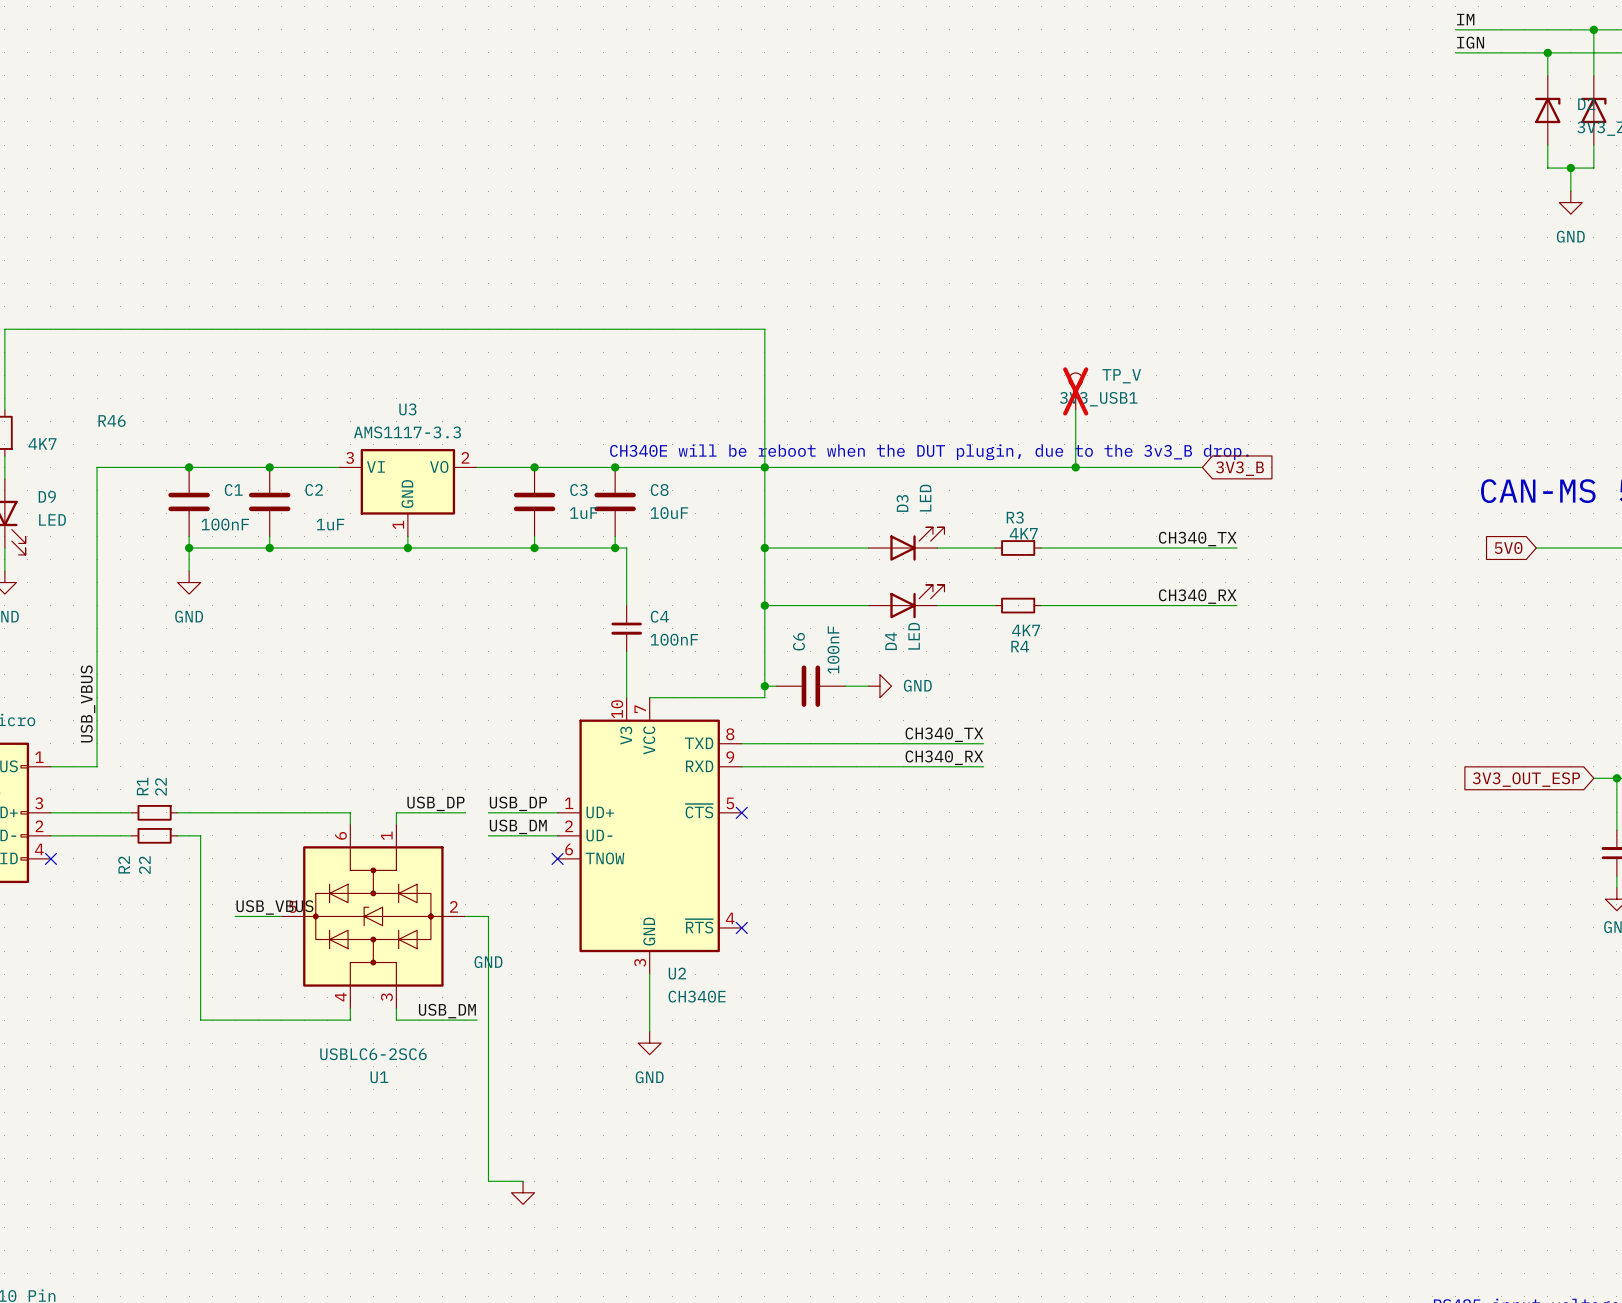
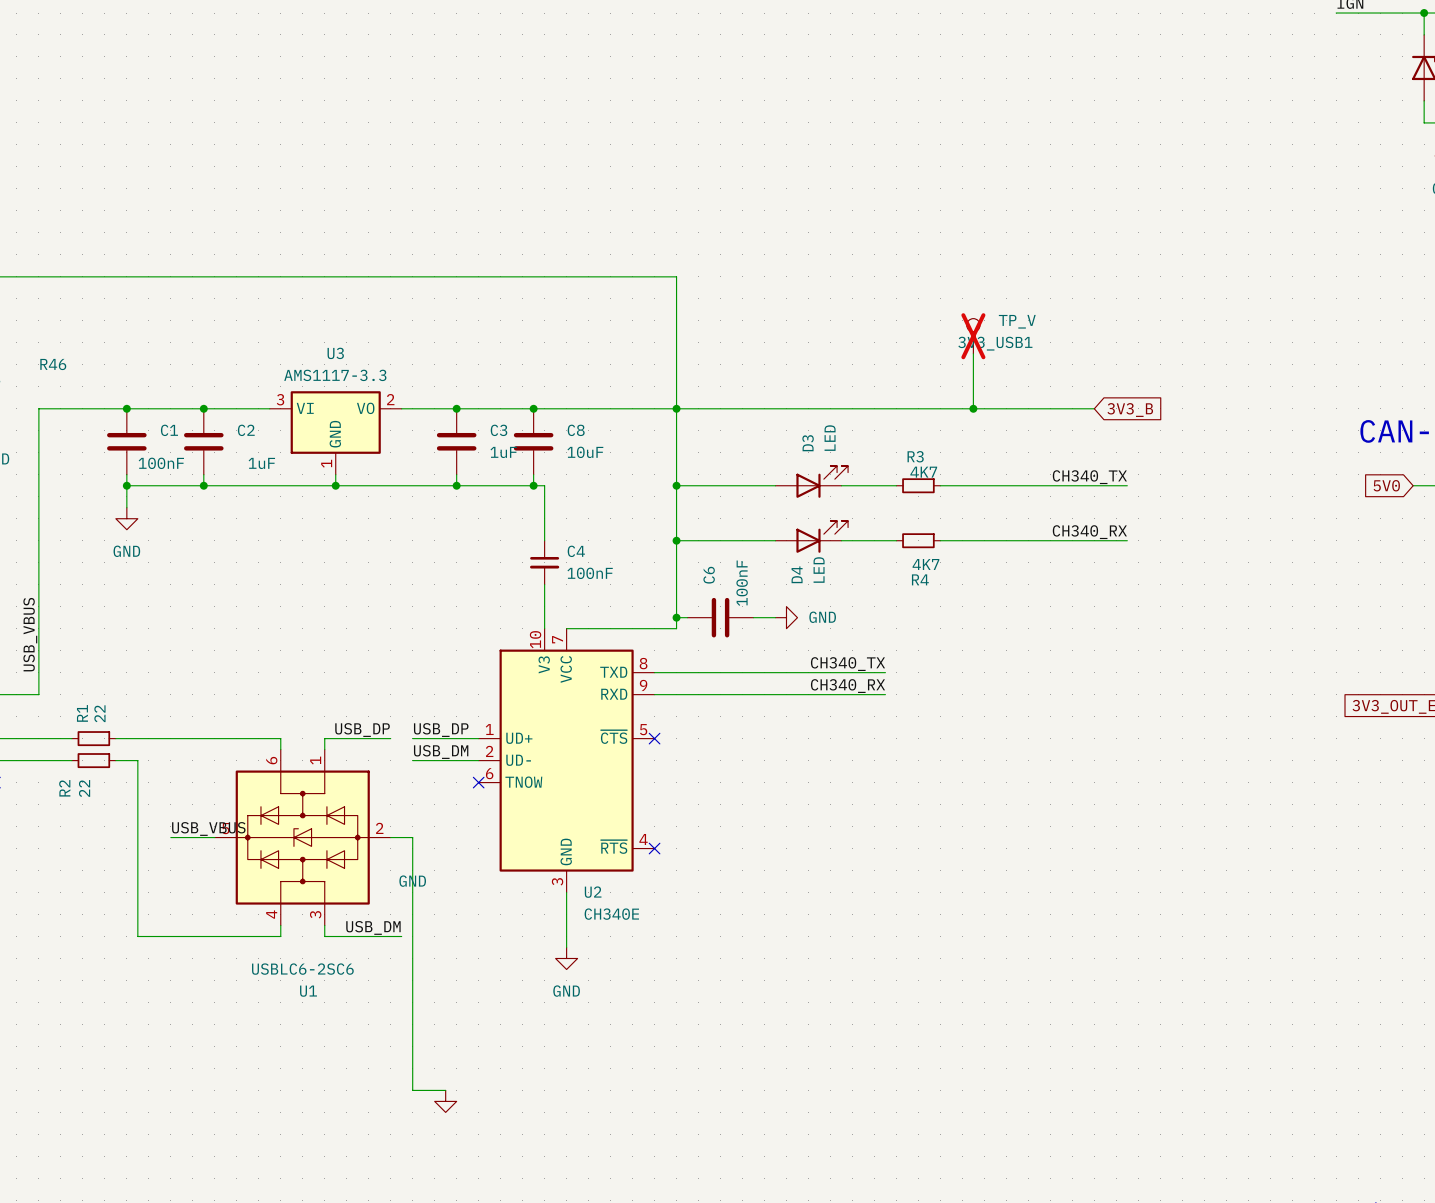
text: CH340E will be reboot when the DUT plugin, due to the 3v3_B drop. (929, 452) -> none

